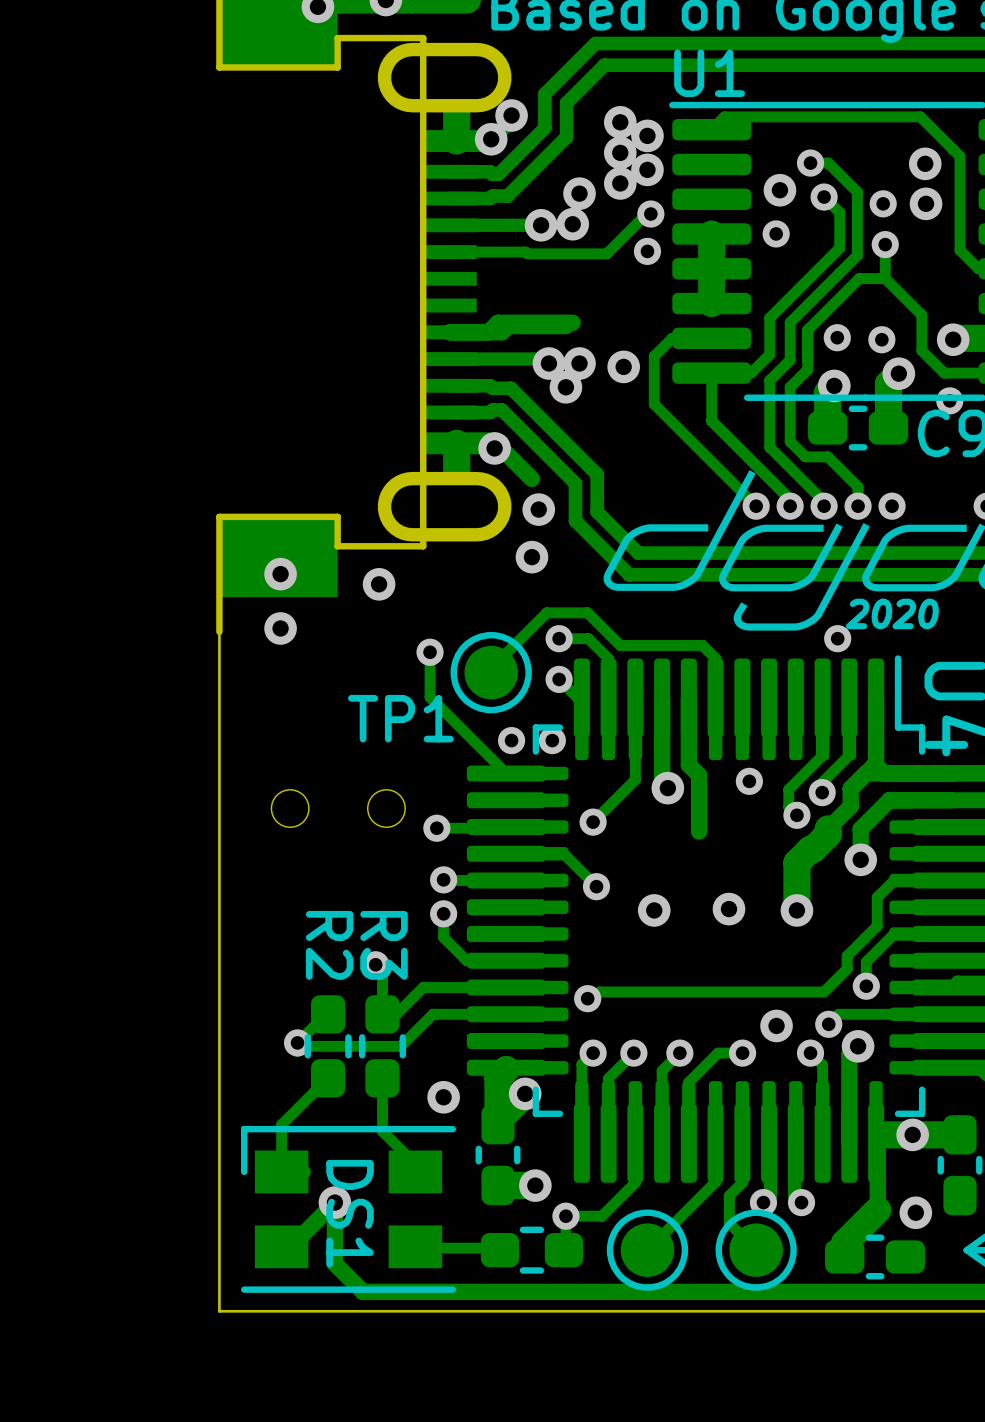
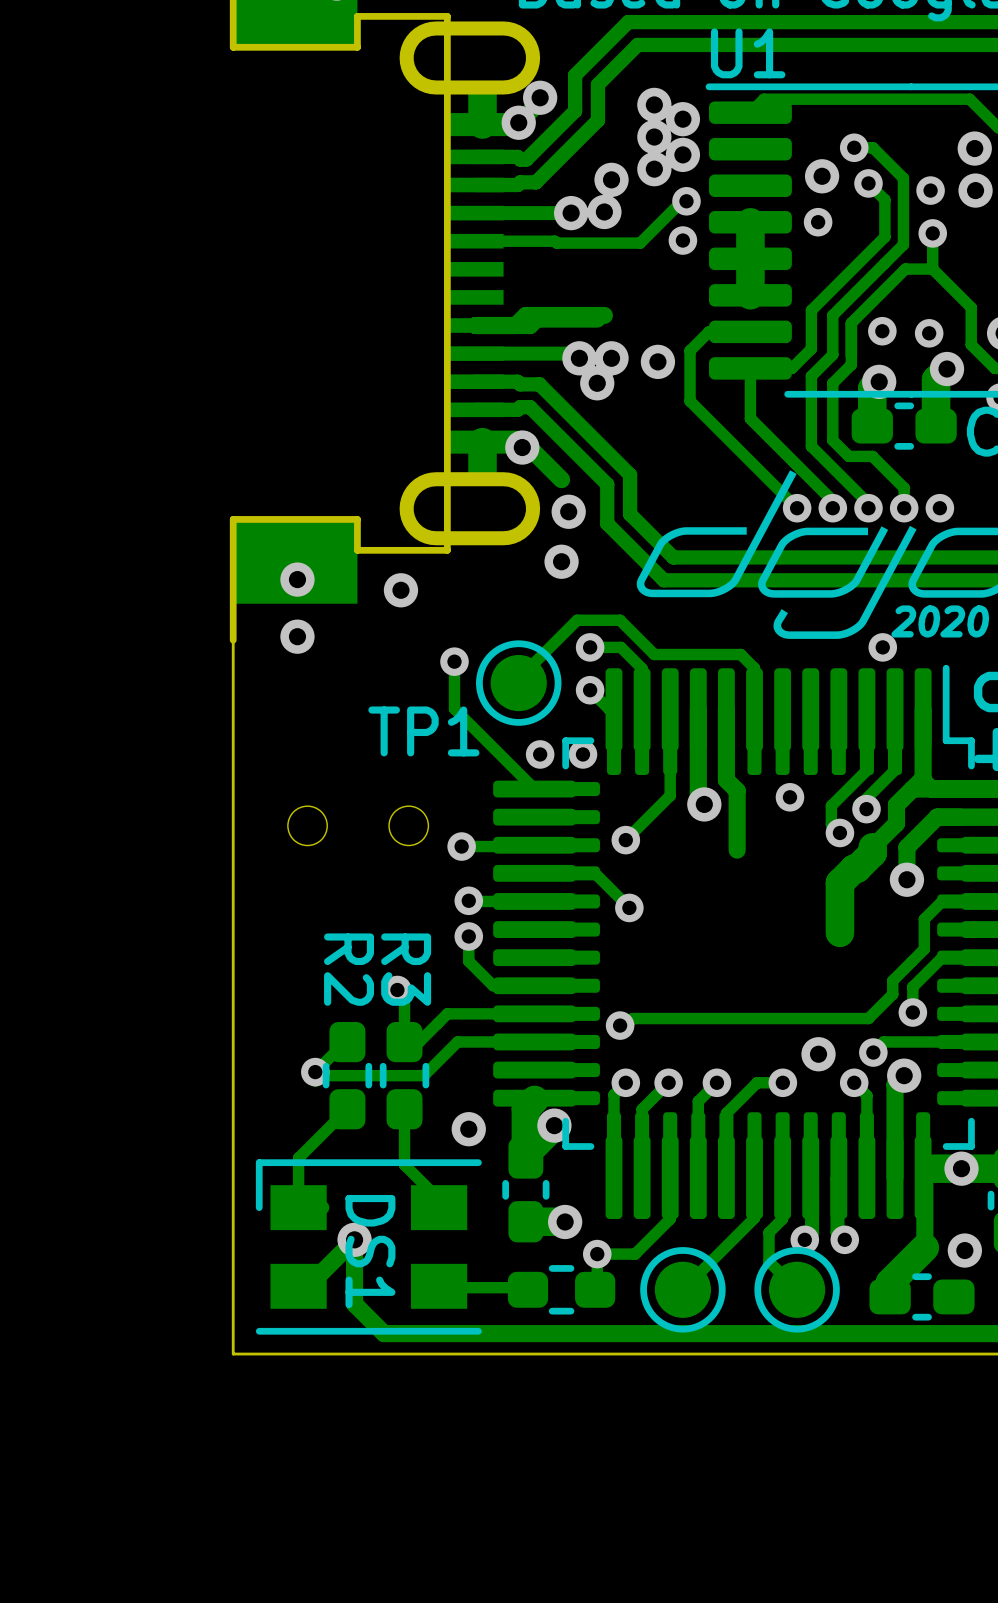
via: (728, 909) -> none
via: (654, 910) -> none
via: (796, 910) -> none

